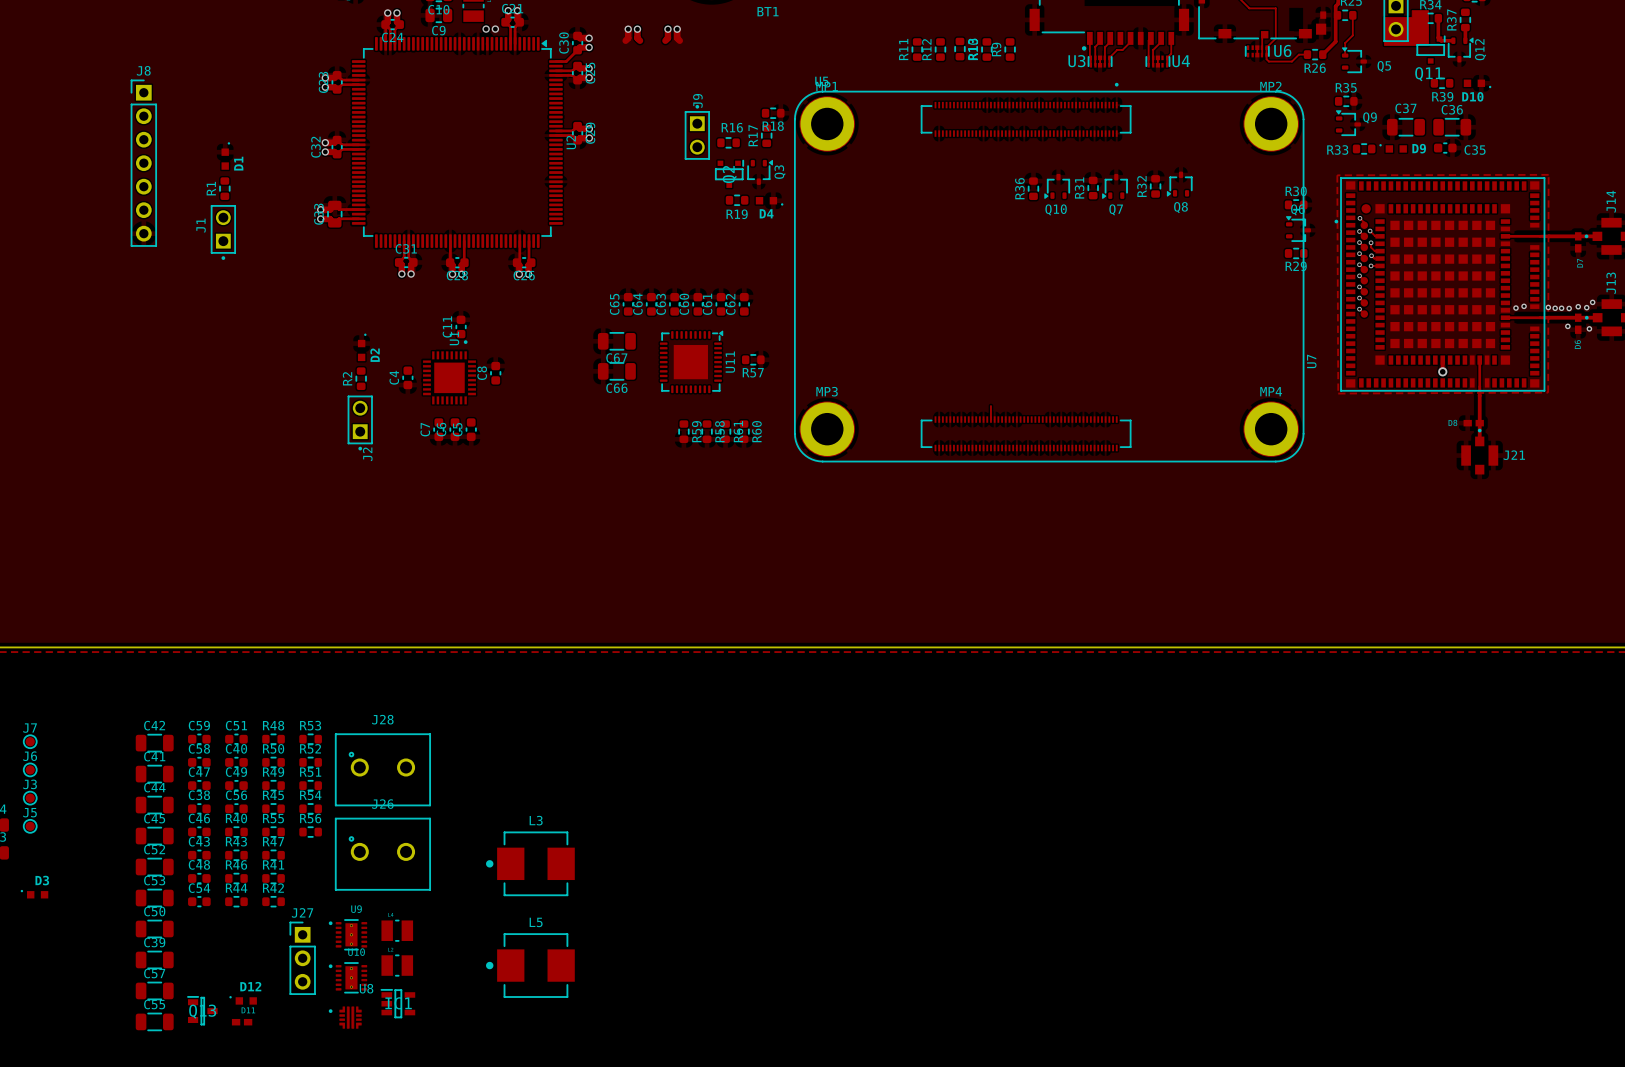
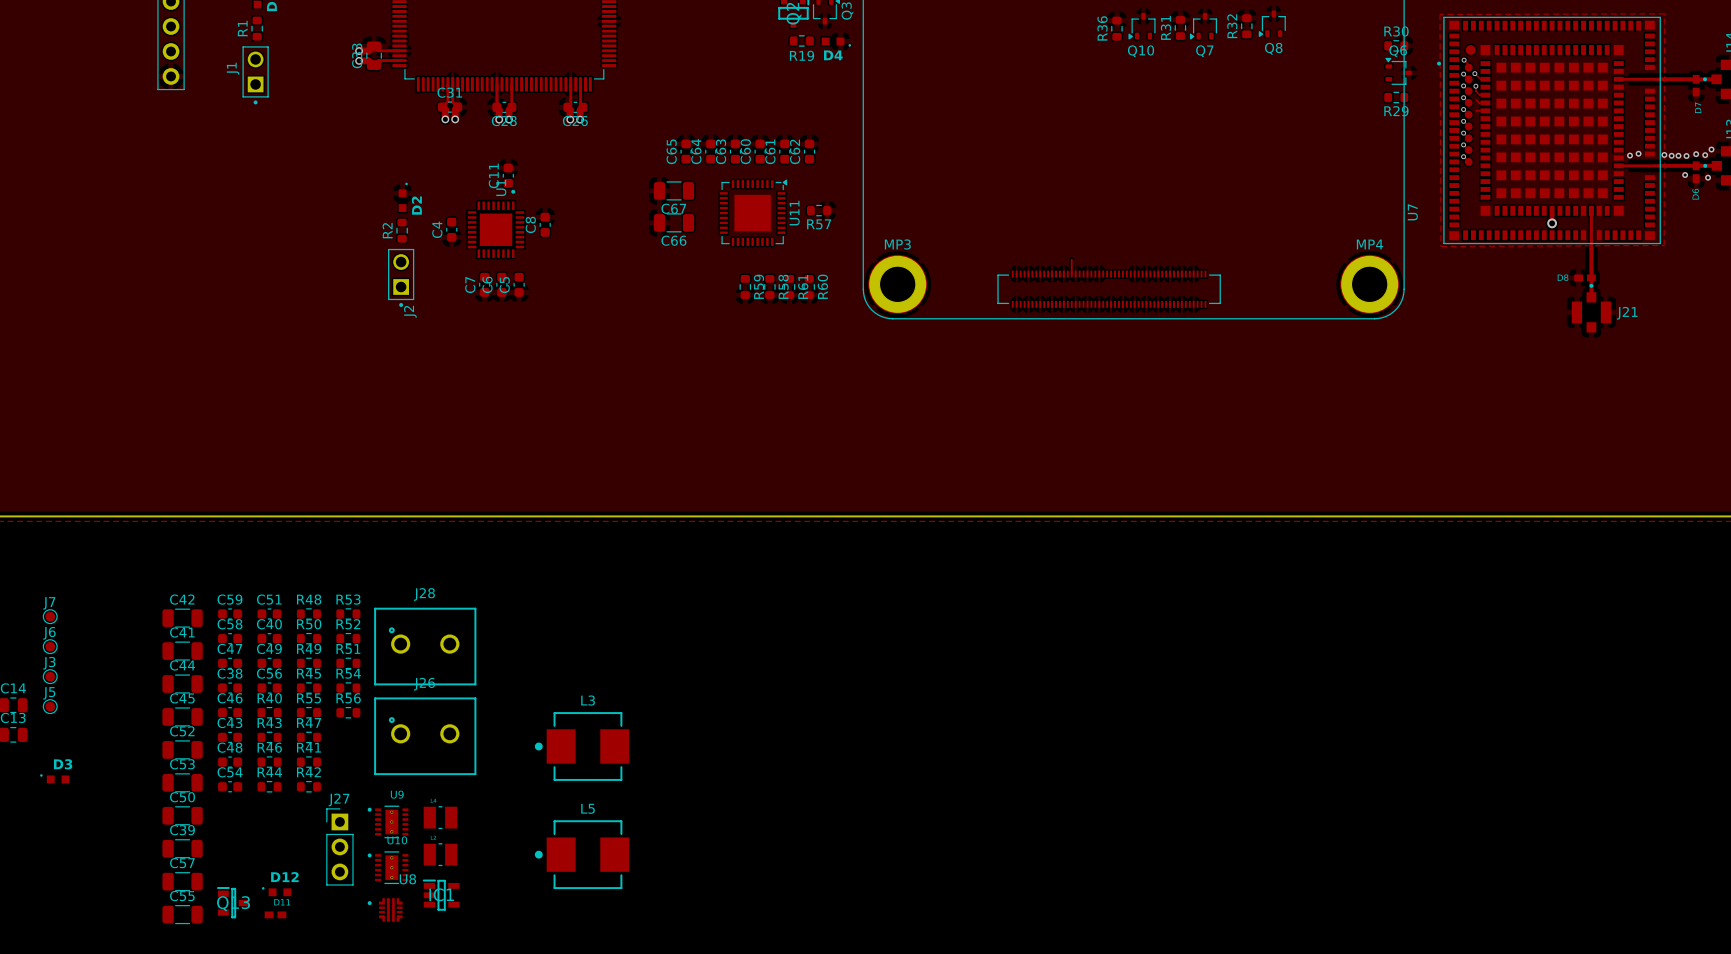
via: (1371, 255) -> none
via: (1371, 265) -> none

